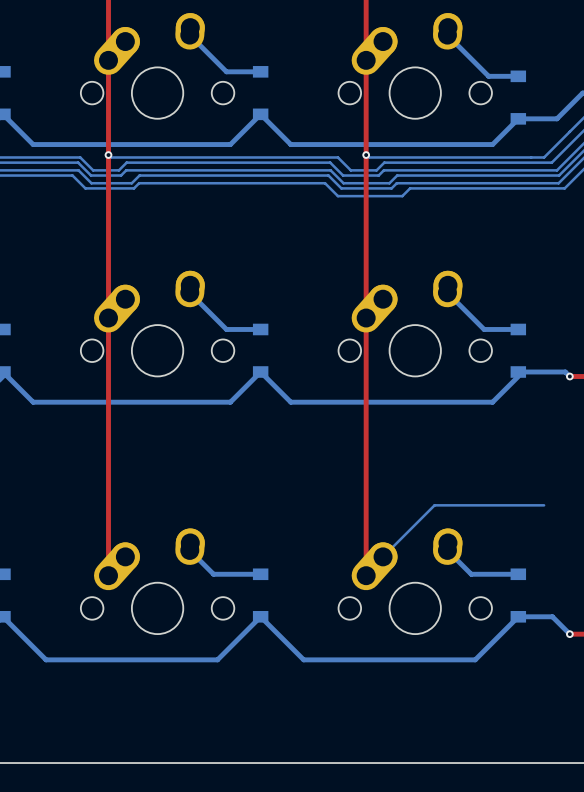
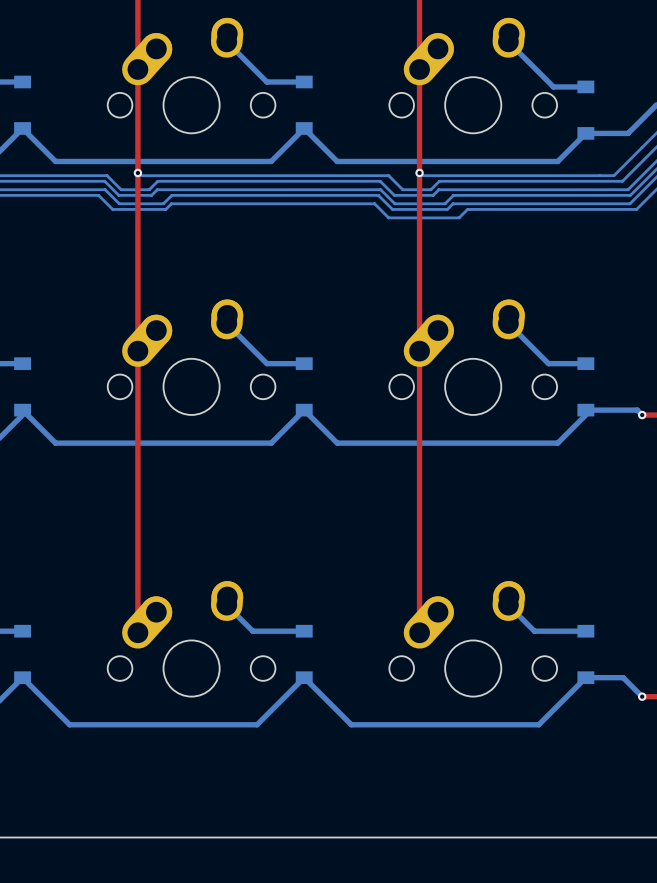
bottom track: (544, 505) (434, 505) (383, 556) -> none

